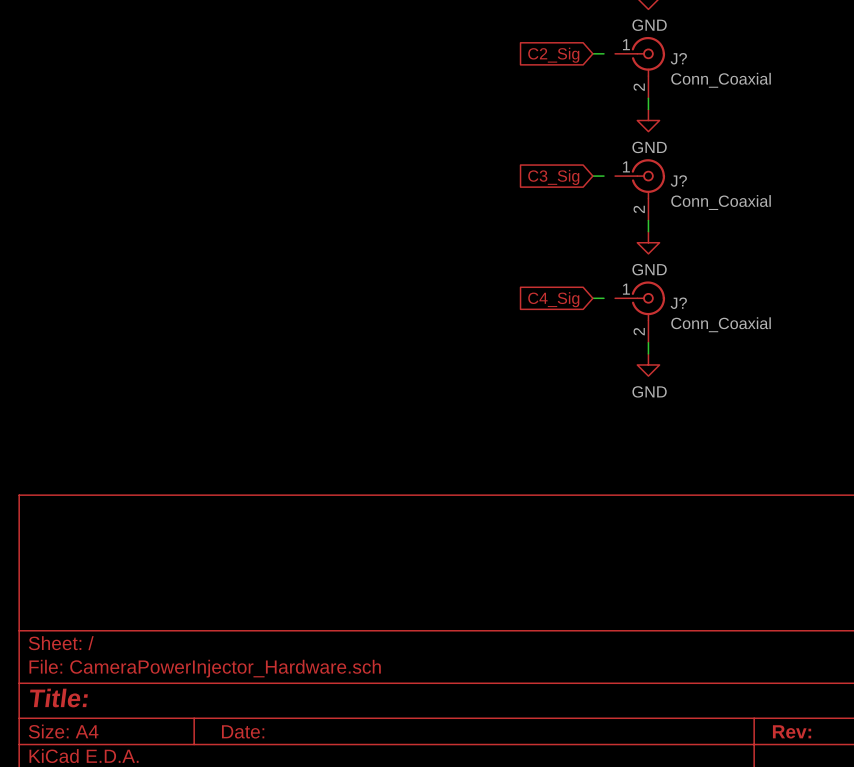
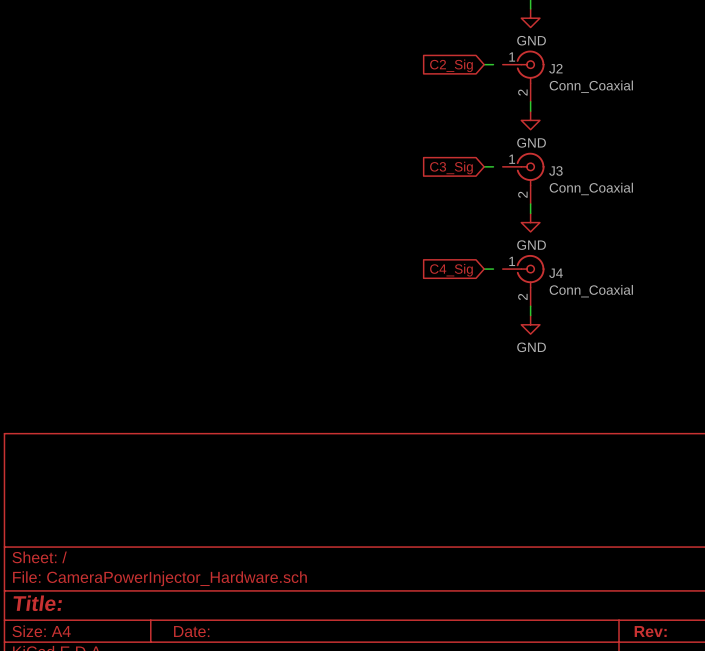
J? name: J? (678, 58) -> J2 (555, 68)
J? name: J? (678, 180) -> J3 (555, 170)
J? name: J? (678, 303) -> J4 (556, 273)

